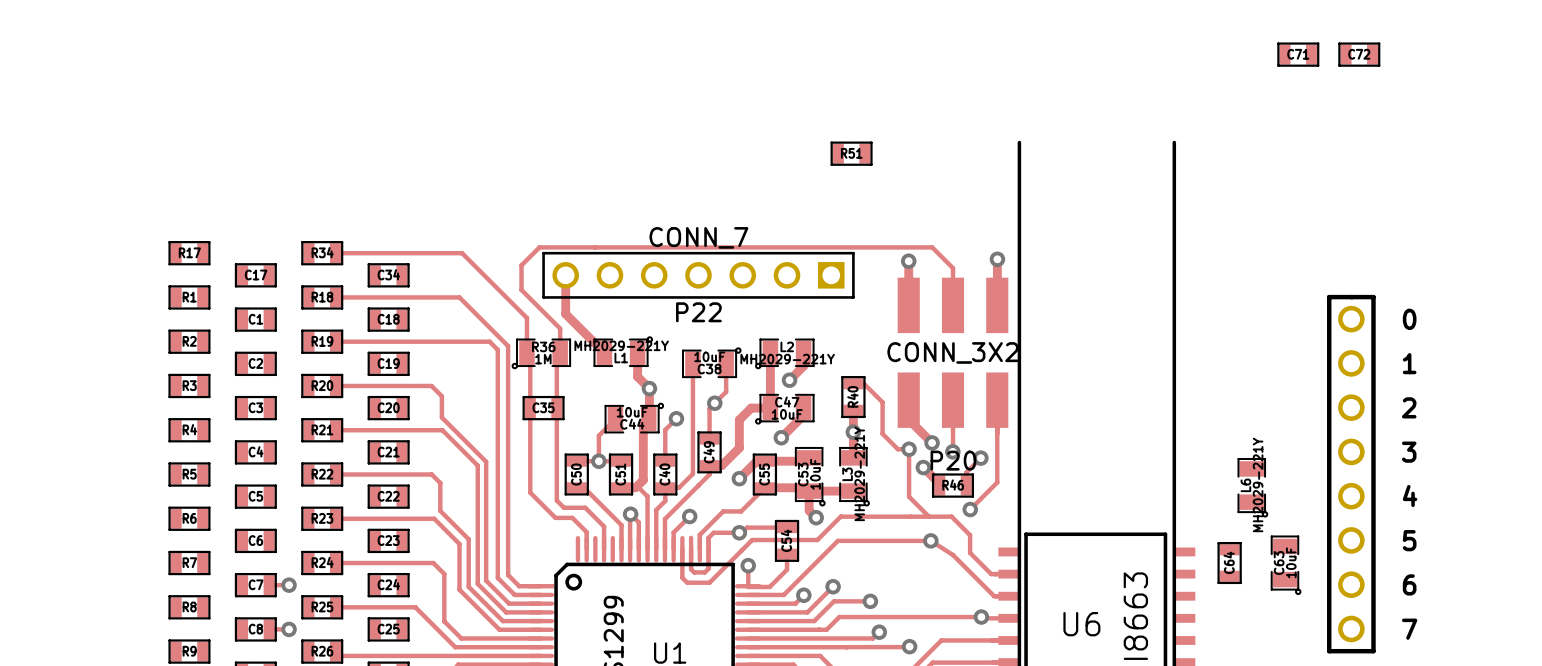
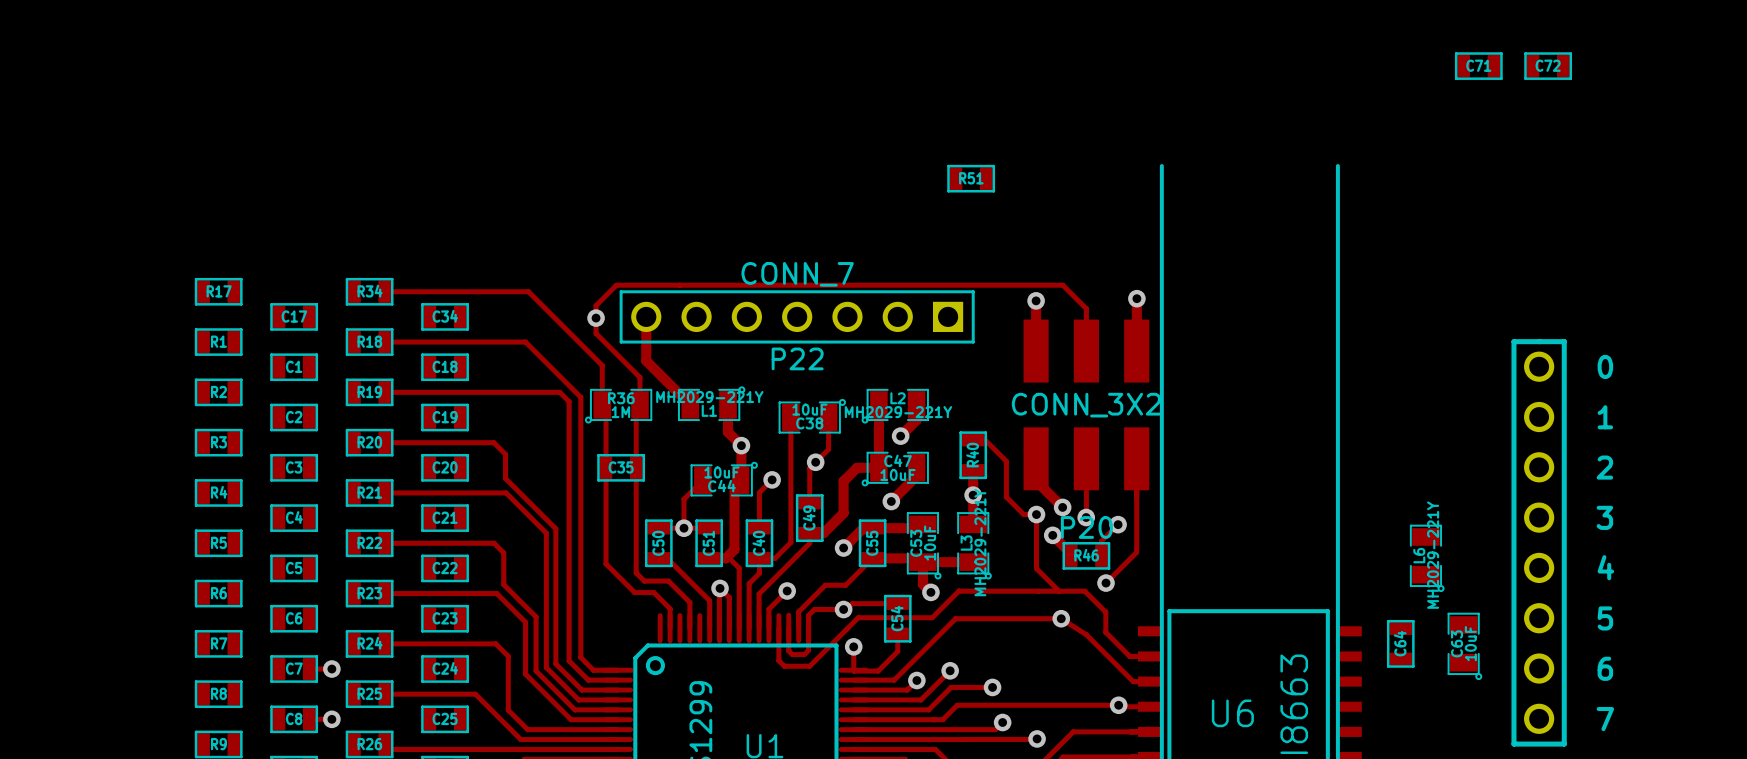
via: none -> (596, 318)

